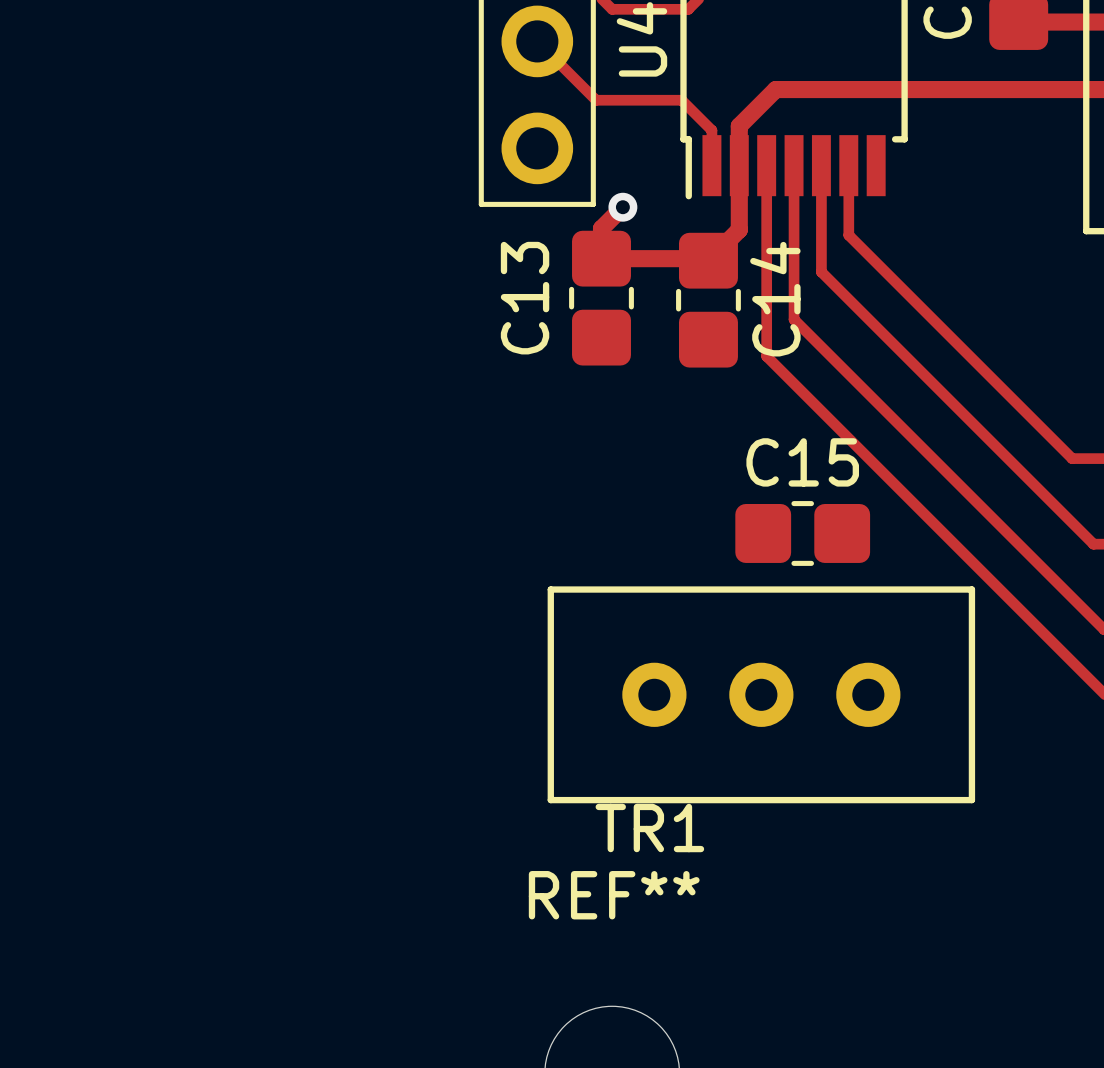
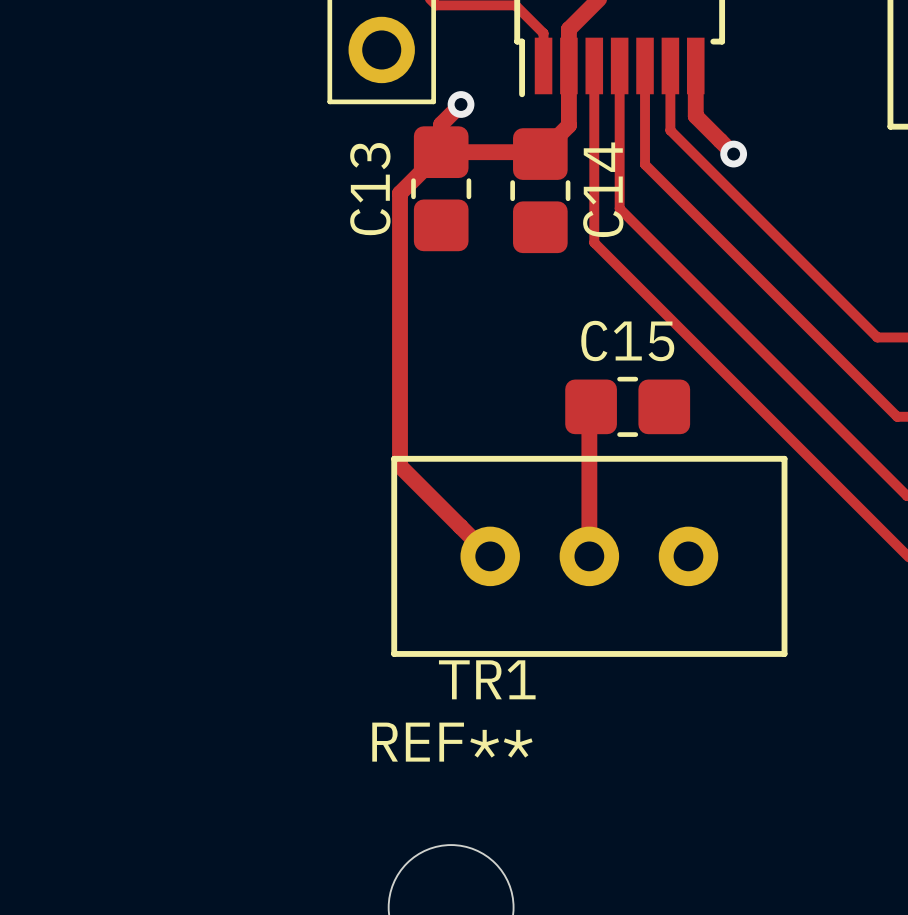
track: none -> (695, 65) (695, 116) (733, 154)
track: none -> (441, 152) (400, 193) (400, 466) (490, 556)
via: none -> (733, 154)
track: none -> (591, 406) (589, 408) (589, 556)

